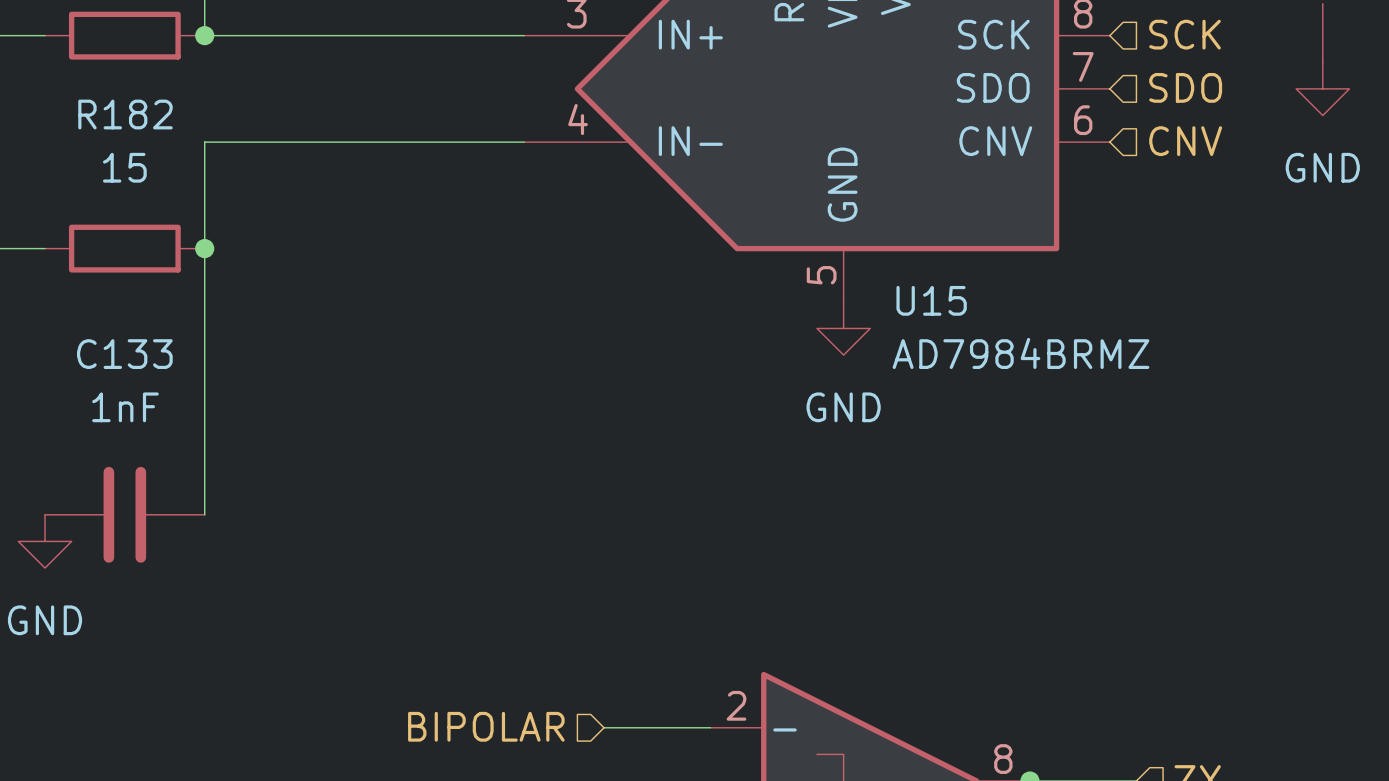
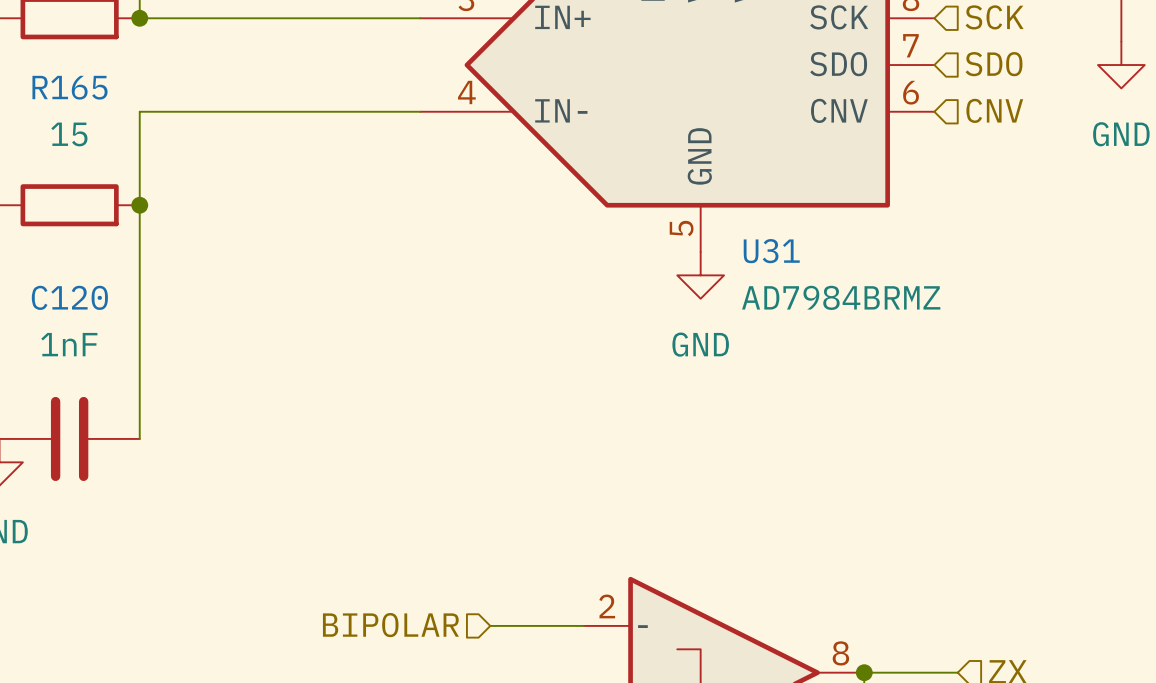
R182 name: R182 (125, 114) -> R165 (70, 87)
U15 name: U15 (931, 300) -> U31 (771, 251)
C133 name: C133 (124, 354) -> C120 (69, 297)

